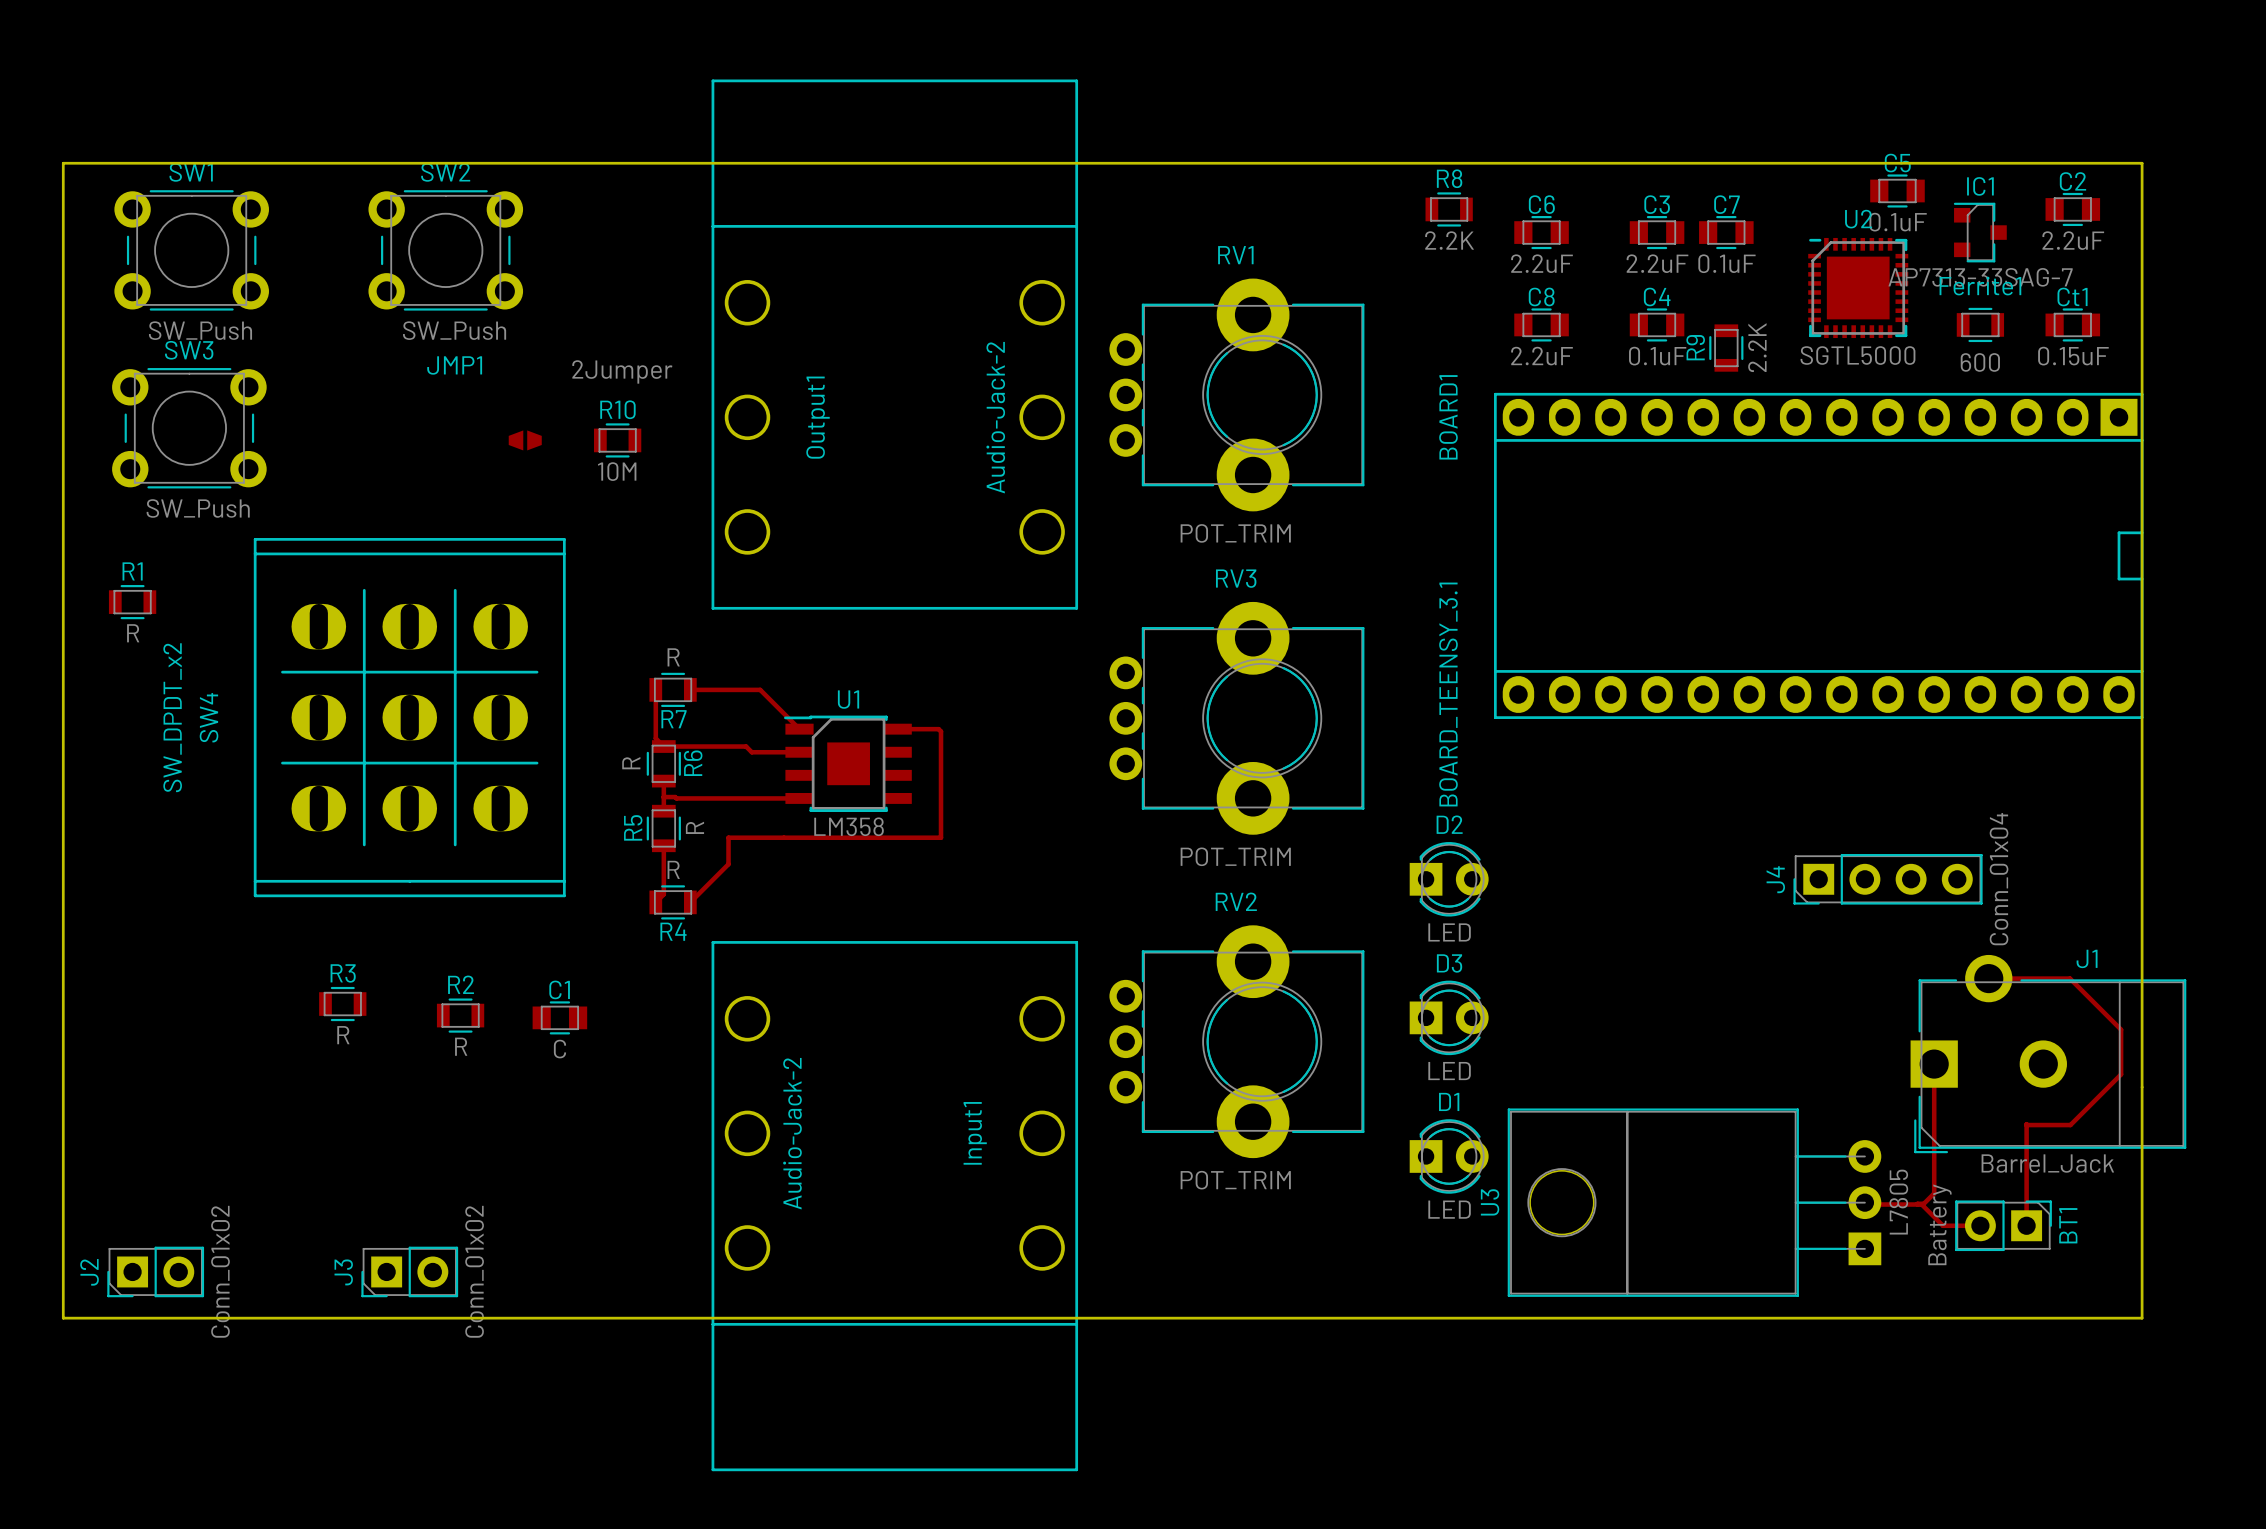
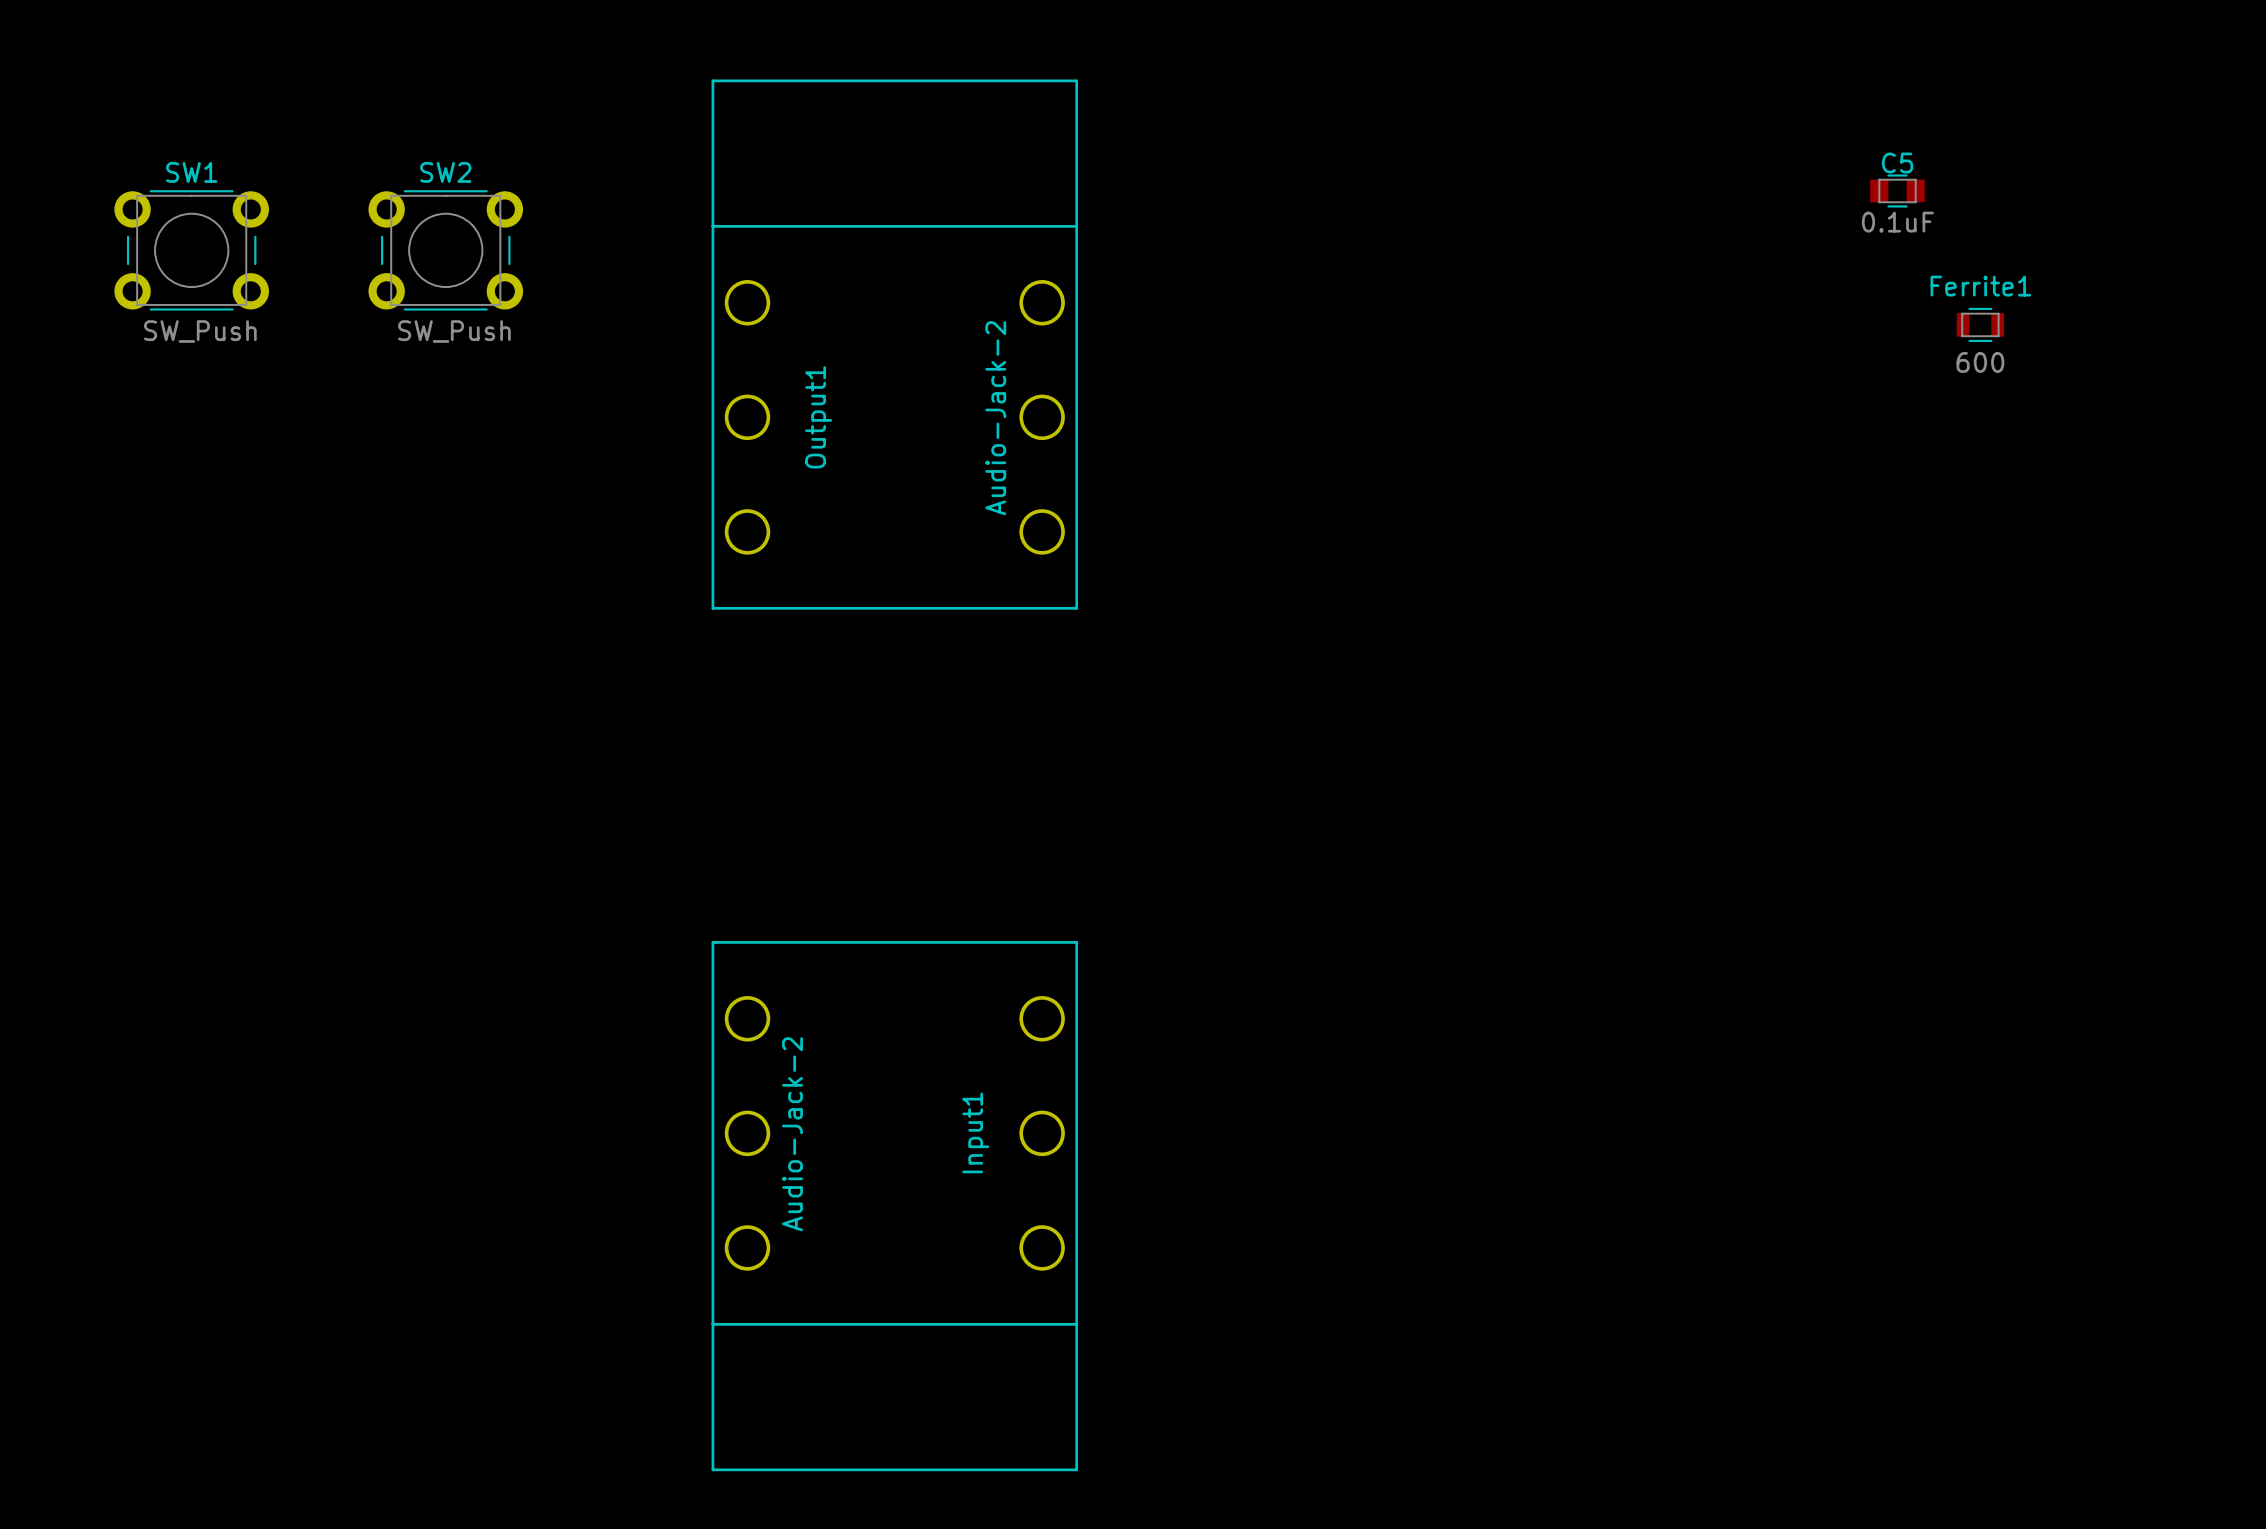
board edge: (63, 163) (63, 1318) (2142, 1318) (2142, 163) (63, 163) -> none
R8: 2.2K (1449, 209) -> none
C2: 2.2uF (2072, 209) -> none
C6: 2.2uF (1541, 232) -> none
C3: 2.2uF (1657, 232) -> none
C7: 0.1uF (1726, 232) -> none
IC1: AP7313-33SAG-7 (1980, 232) -> none
U2: SGTL5000 (1858, 287) -> none
C8: 2.2uF (1541, 324) -> none
C4: 0.1uF (1657, 324) -> none
Ct1: 0.15uF (2072, 324) -> none
R9: 2.2K (1726, 348) -> none
RV1: POT_TRIM (1236, 394) -> none
SW3: SW_Push (189, 428) -> none
JMP1: 2Jumper (525, 440) -> none
R10: 10M (617, 440) -> none
BOARD1: BOARD_TEENSY_3.1 (1818, 555) -> none
R1: R (132, 602) -> none
top track: (655, 689) (655, 738) (663, 746) (746, 746) (751, 752) (799, 752) -> none
R7: R (673, 689) -> none
top track: (690, 689) (760, 689) (799, 729) -> none
SW4: SW_DPDT_x2 (409, 717) -> none
RV3: POT_TRIM (1236, 718) -> none
top track: (897, 729) (938, 729) (941, 731) (941, 837) (728, 837) (728, 864) (690, 902) -> none
R6: R (663, 763) -> none
U1: LM358 (847, 763) -> none
top track: (663, 781) (663, 811) -> none
top track: (663, 797) (799, 798) -> none
R5: R (663, 828) -> none
top track: (663, 845) (663, 894) (655, 902) -> none
D2: LED (1449, 879) -> none
J4: Conn_01x04 (1888, 879) -> none
R4: R (673, 902) -> none
top track: (1988, 978) (2070, 978) (2121, 1029) (2121, 1074) (2070, 1125) (2026, 1125) -> none
R3: R (342, 1004) -> none
R2: R (460, 1015) -> none
C1: C (559, 1017) -> none
D3: LED (1449, 1017) -> none
RV2: POT_TRIM (1236, 1041) -> none
J1: Barrel_Jack (2048, 1054) -> none
top track: (1934, 1064) (1934, 1193) (1923, 1203) (1917, 1204) -> none
top track: (2026, 1124) (2026, 1225) -> none
D1: LED (1449, 1156) -> none
U3: L7805 (1694, 1202) -> none
top track: (1864, 1202) (1866, 1204) (1921, 1204) (1942, 1225) (1980, 1225) -> none
BT1: Battery (2003, 1225) -> none
J2: Conn_01x02 (155, 1271) -> none
J3: Conn_01x02 (409, 1271) -> none

